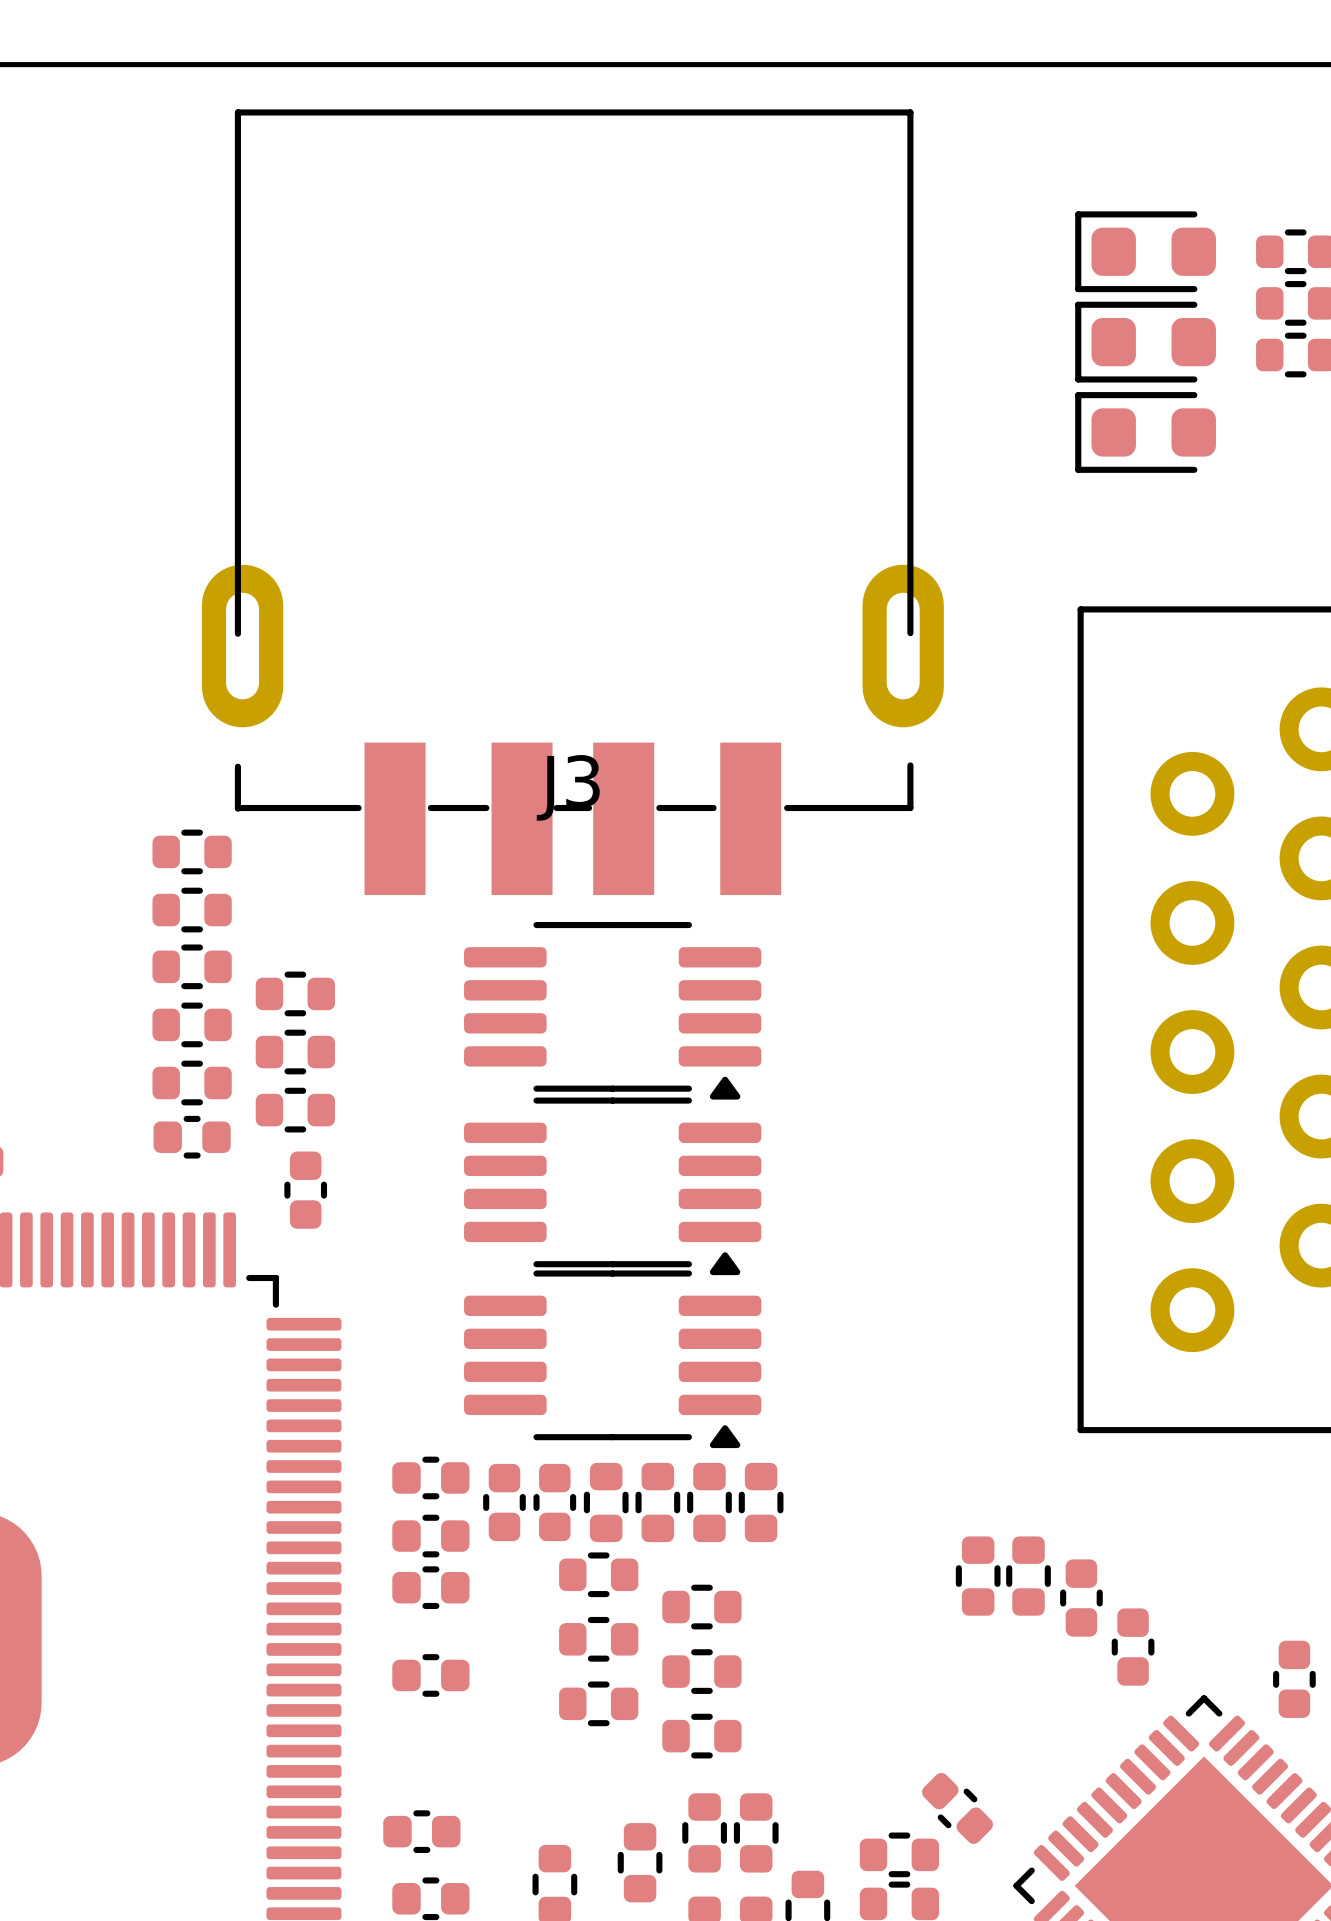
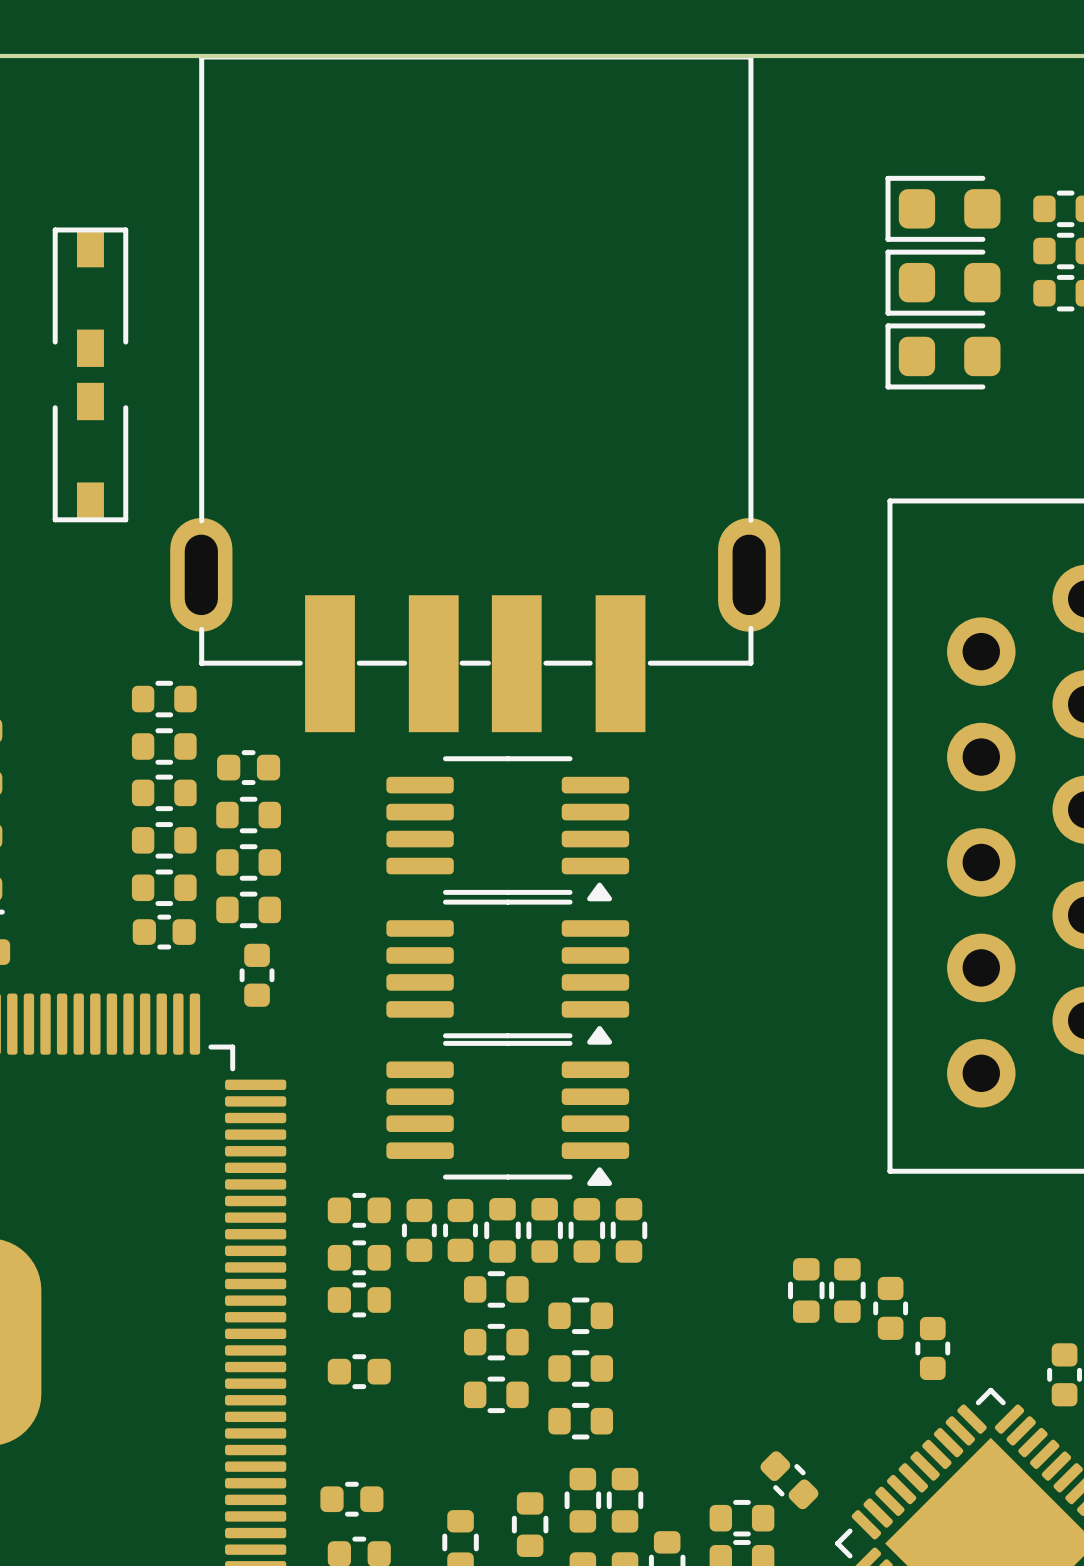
part: none -> (90, 297)
part: none -> (475, 393)
J3: (572, 502) -> none
part: none -> (90, 452)
part: none -> (248, 767)

